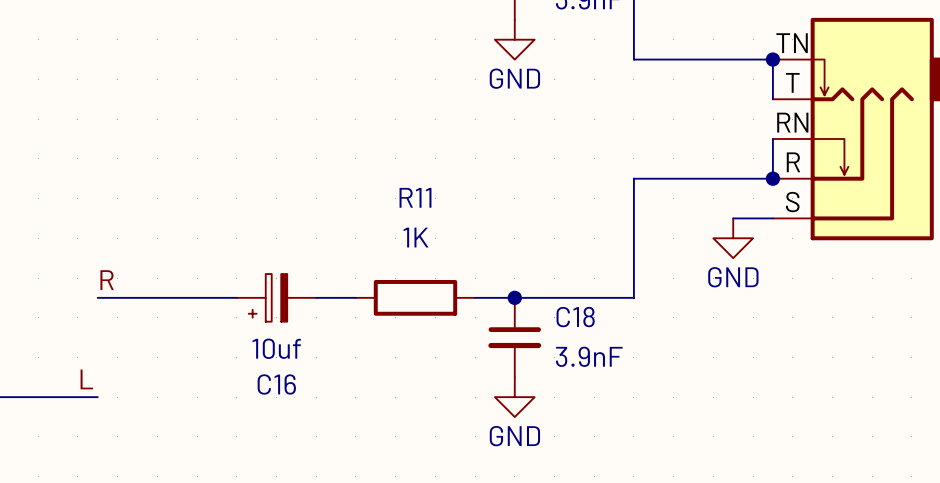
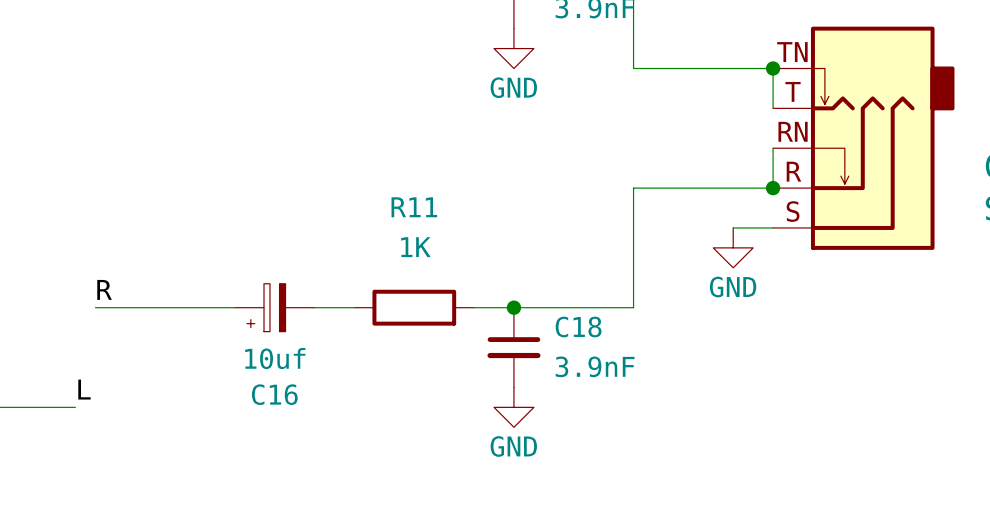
wire: (77, 397) (97, 397) -> none

